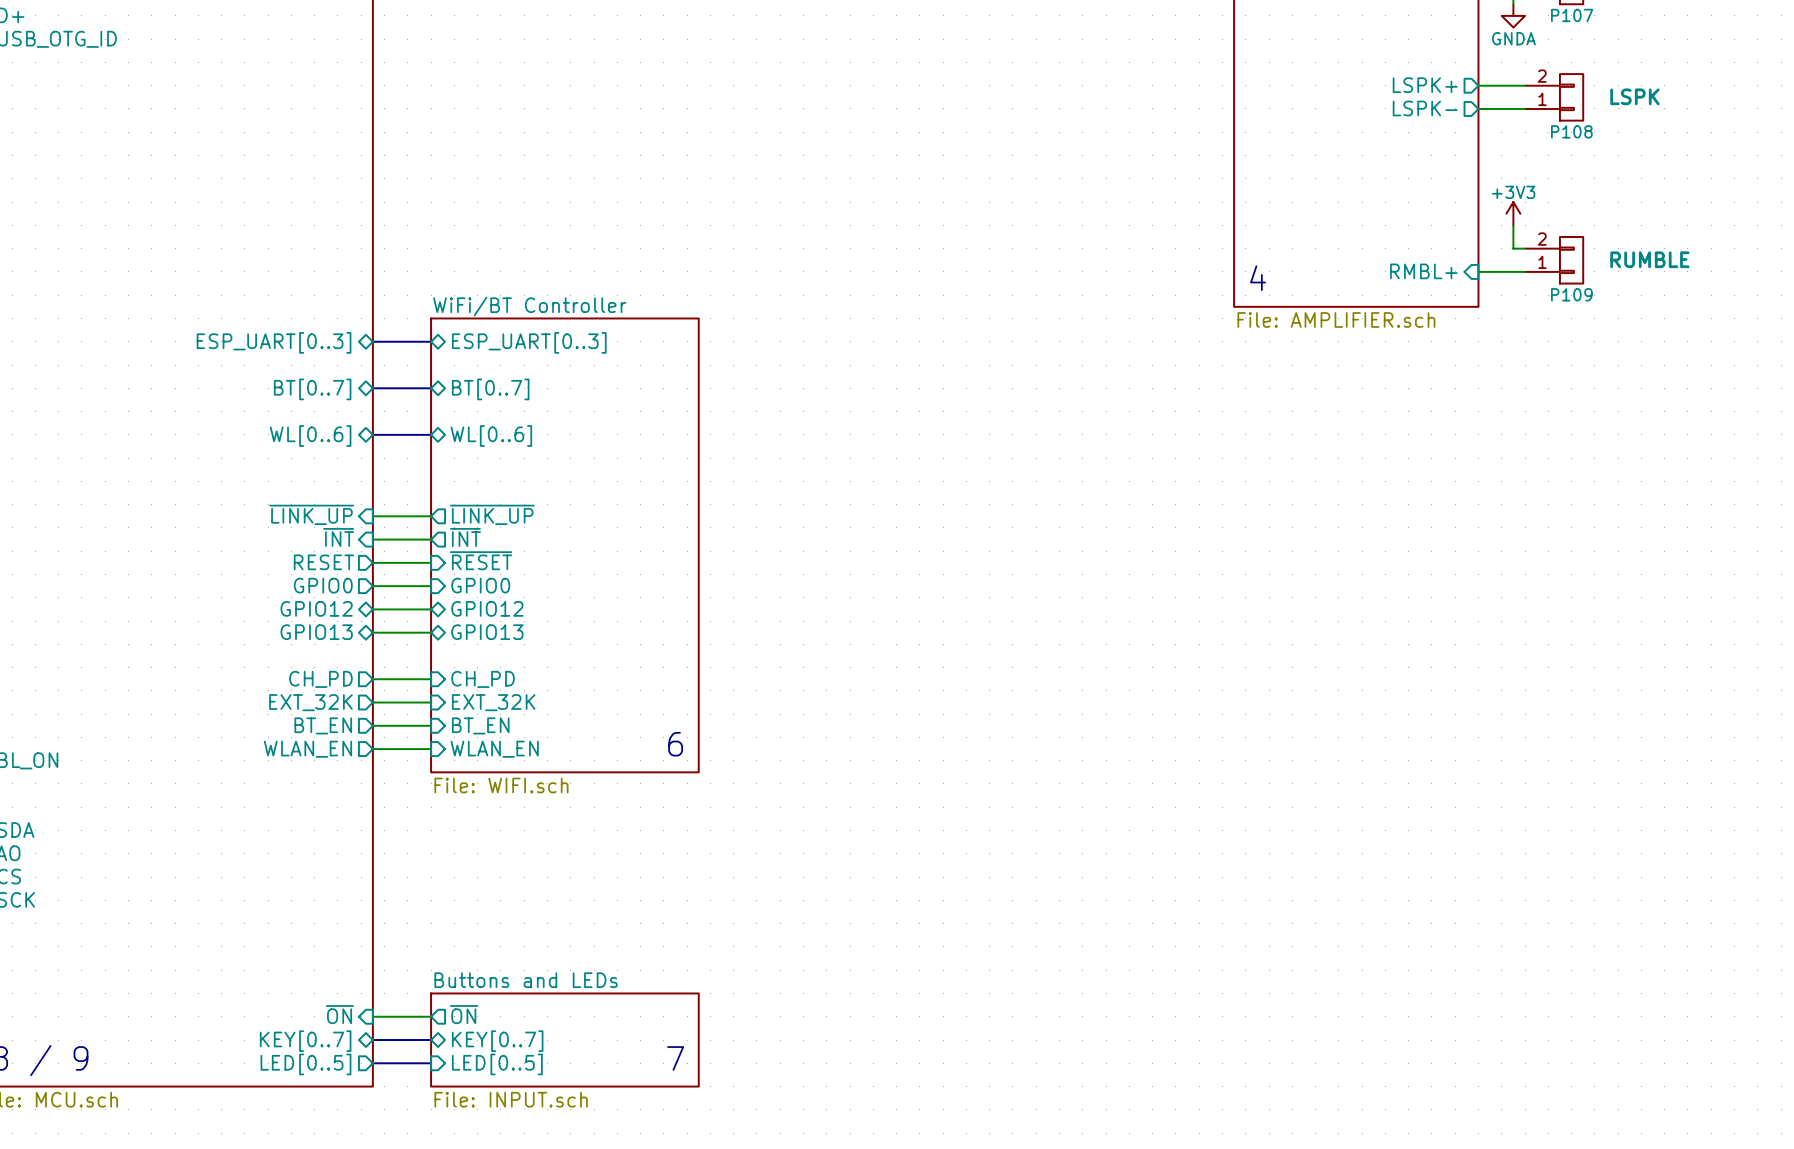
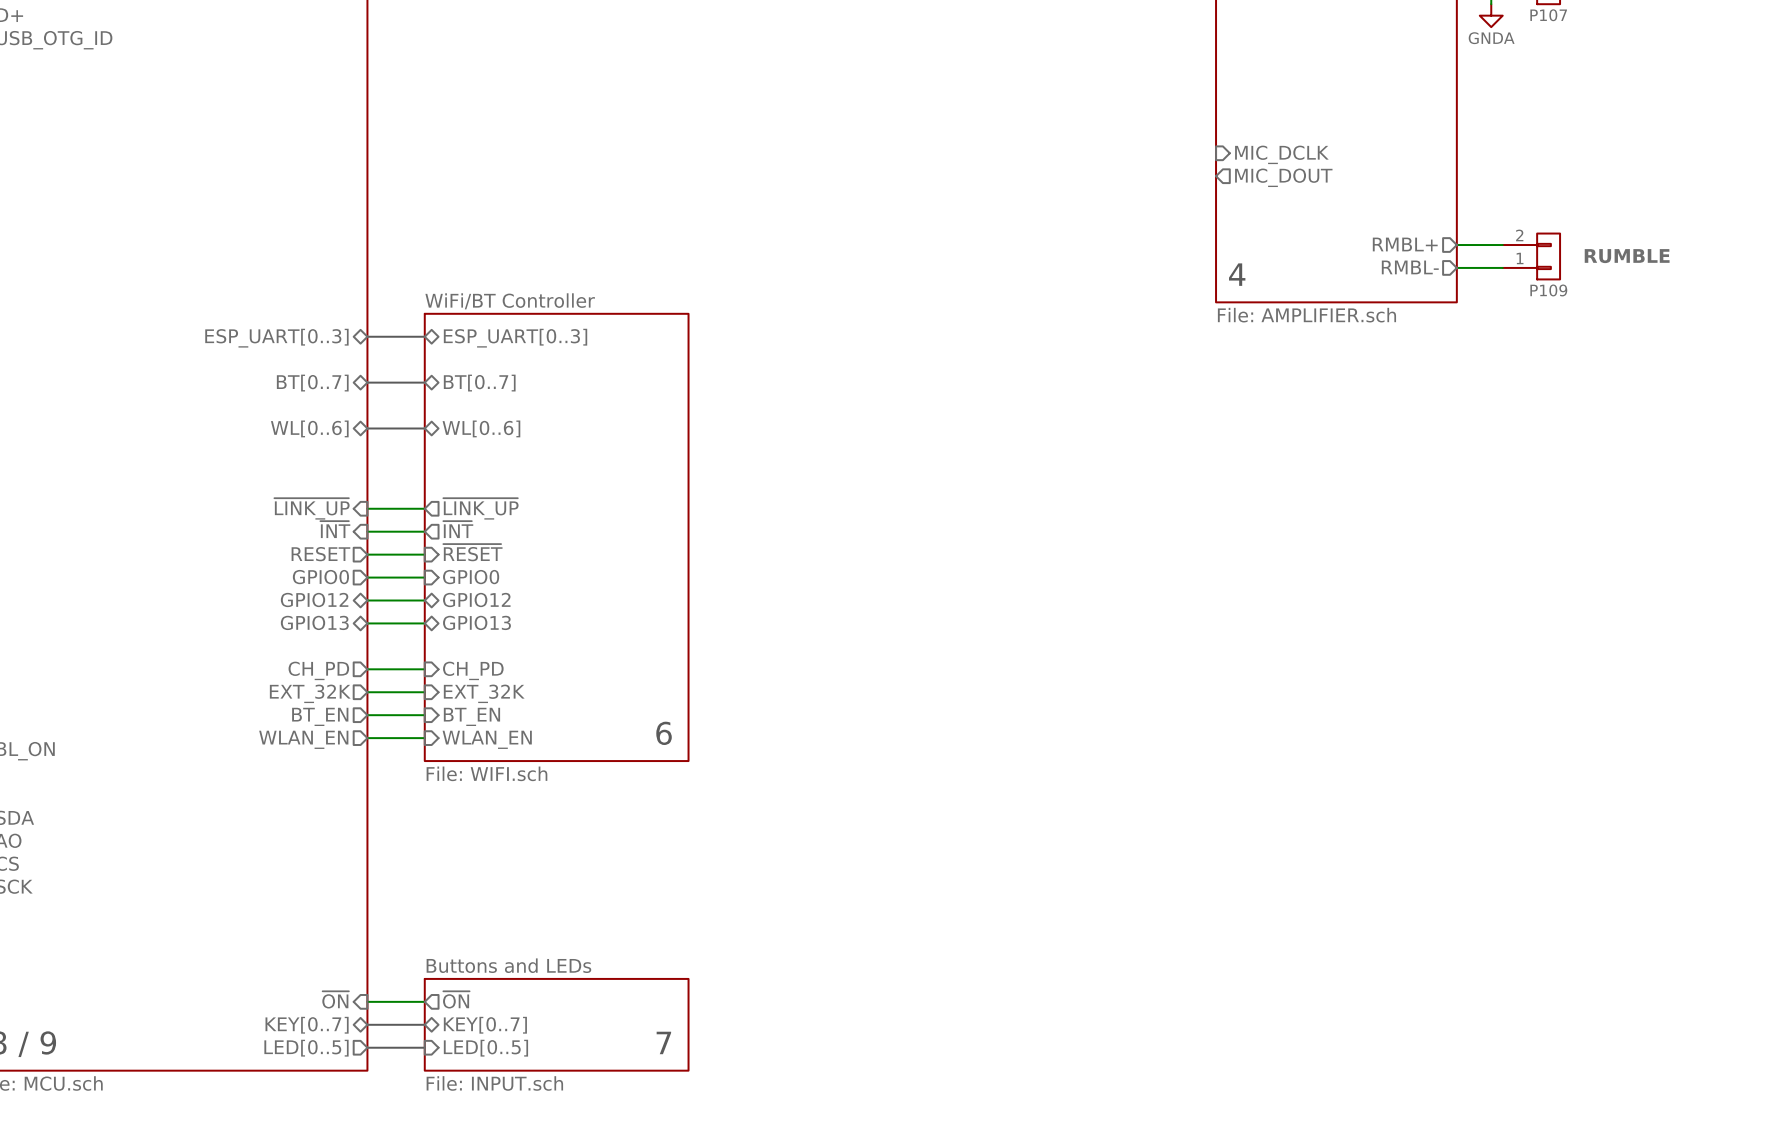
sheet pin: LSPK+ (1425, 85) -> none
wire: (1478, 85) (1525, 85) -> none
P108: LSPK (1554, 97) -> none
sheet pin: LSPK- (1425, 108) -> none
wire: (1478, 108) (1525, 108) -> none
sheet pin: none -> MIC_DCLK (1281, 154)
sheet pin: none -> MIC_DOUT (1283, 177)
power symbol: +3V3 (1513, 213) -> none
wire: (1513, 225) (1513, 248) -> (1456, 245) (1491, 245)
sheet pin: none -> RMBL+ (1405, 244)
sheet pin shape: input (1423, 271) -> output (1410, 267)
sheet pin: RMBL+ (1423, 271) -> RMBL- (1410, 267)

